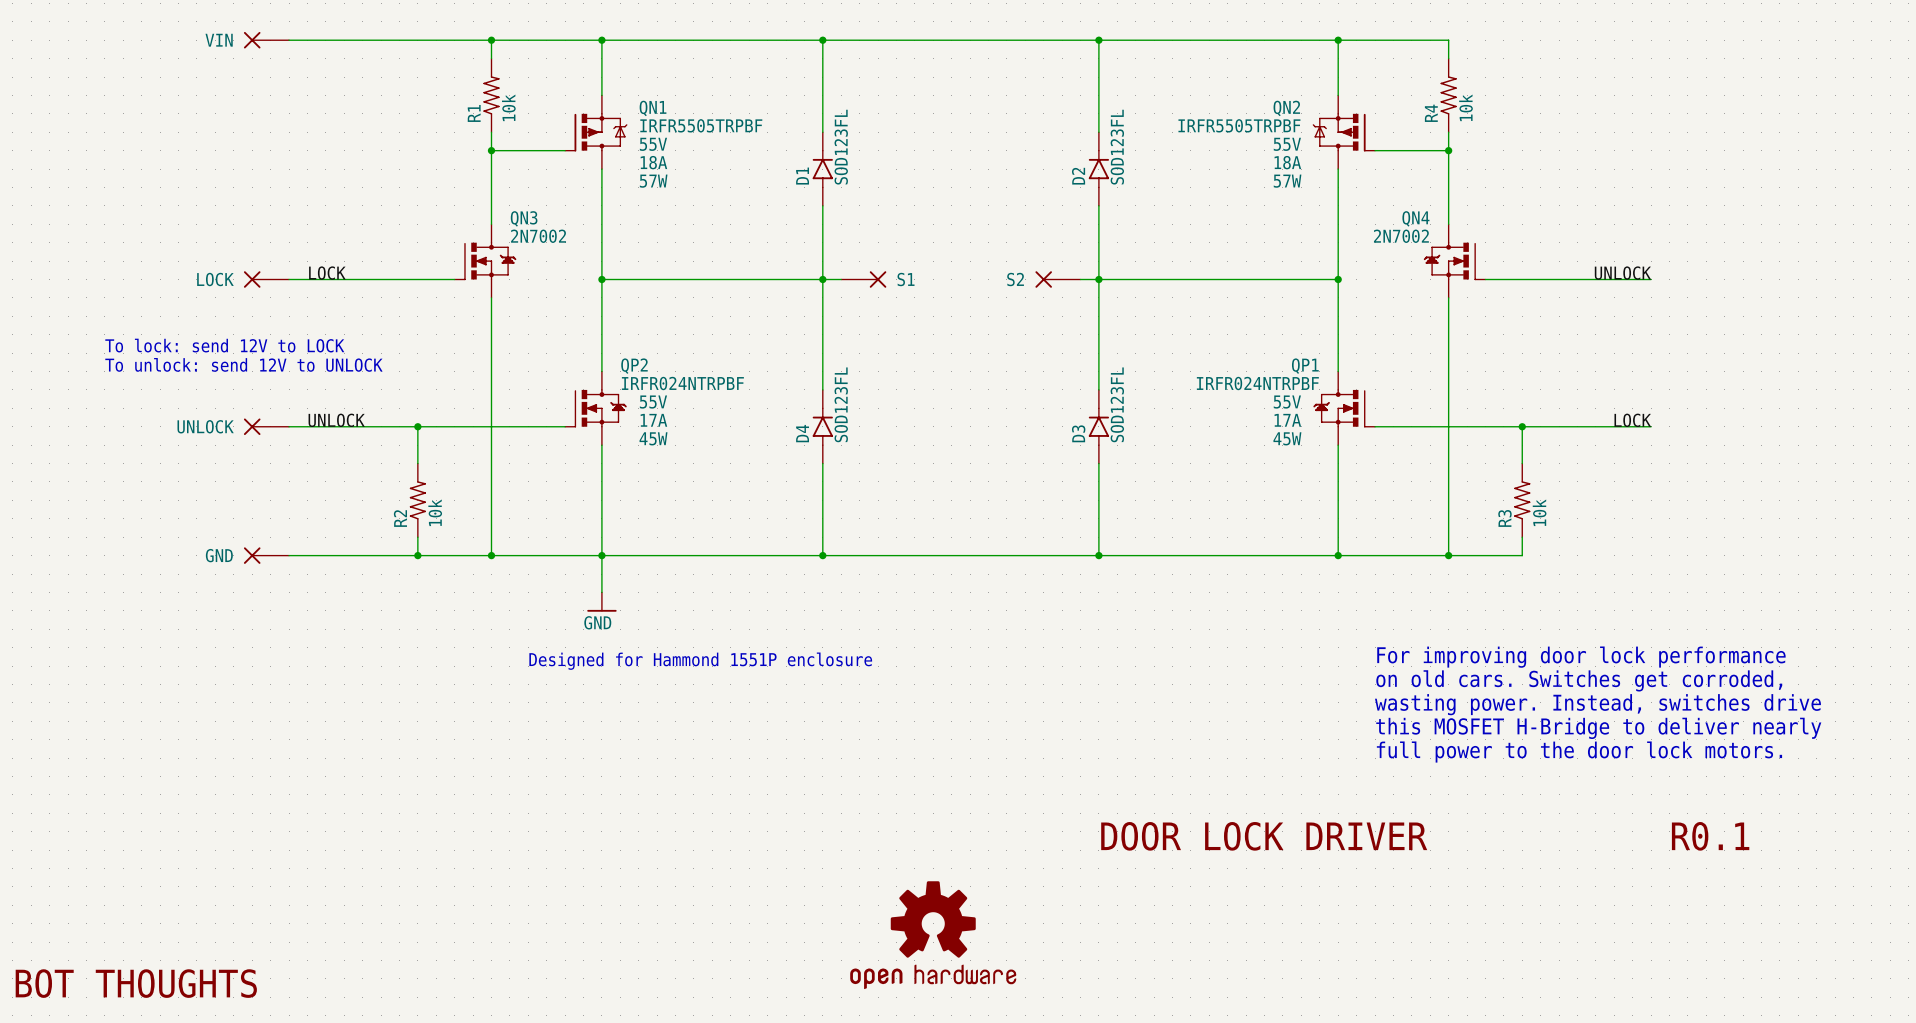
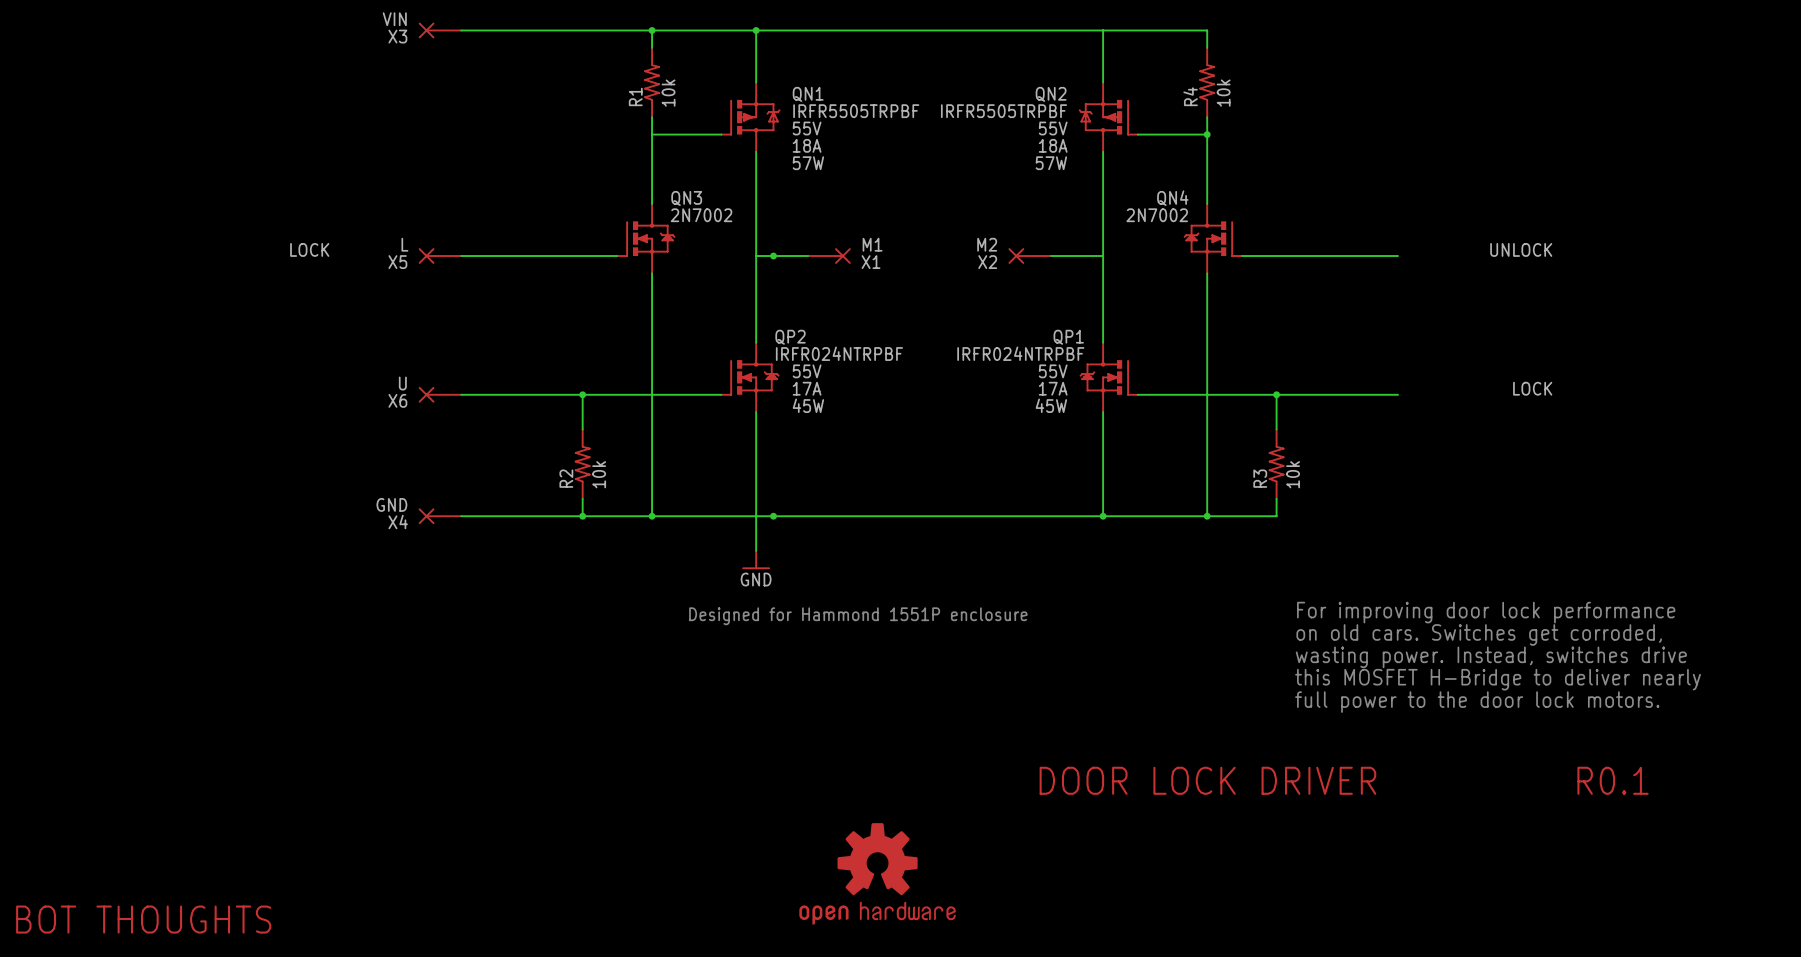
part: VIN (266, 40) -> none
wire: (289, 40) (491, 40) (491, 58) -> none
X3: none -> VIN (439, 30)
junction: (491, 40) -> none
wire: (601, 40) (601, 95) -> none
junction: (601, 40) -> none
wire: none -> (652, 30) (652, 47)
junction: none -> (652, 30)
wire: none -> (756, 30) (756, 82)
wire: (822, 40) (822, 132) -> (652, 117) (652, 203)
junction position: (822, 40) -> (756, 30)
wire: (1098, 40) (1098, 132) -> none
junction: (1098, 40) -> none
wire: (1282, 40) (1448, 40) (1448, 58) -> (1207, 30) (1207, 47)
wire: (1338, 40) (1338, 95) -> (1103, 30) (1103, 82)
junction: (1338, 40) -> none
R1 position: (491, 95) -> (652, 82)
R4 position: (1448, 95) -> (1207, 82)
wire: (491, 132) (491, 224) -> none
QN1 position: (595, 132) -> (750, 117)
QN2 position: (1344, 132) -> (1108, 117)
wire: (1448, 132) (1448, 224) -> (1207, 117) (1207, 203)
wire: (491, 150) (565, 150) -> none
junction: (491, 150) -> none
wire: none -> (652, 134) (721, 134)
junction: none -> (1207, 134)
wire: (1375, 150) (1448, 150) -> (1137, 134) (1207, 134)
junction: (1448, 150) -> none
wire: (601, 169) (601, 371) -> none
wire: none -> (756, 151) (756, 342)
D1: SOD123FL (822, 169) -> none
D2: SOD123FL (1098, 169) -> none
wire: (1338, 169) (1338, 371) -> (1103, 151) (1103, 342)
wire: (822, 205) (822, 389) -> none
wire: (1098, 205) (1098, 389) -> none
QN3 position: (485, 261) -> (646, 238)
QN4 position: (1454, 261) -> (1213, 238)
part: LOCK (266, 279) -> none
wire: (289, 279) (454, 279) -> none
X5: none -> L (439, 256)
wire: none -> (461, 256) (565, 256)
junction: (601, 279) -> none
wire: (657, 279) (804, 279) -> none
part: S1 (863, 279) -> none
X1: none -> M1 (829, 256)
part: S2 (1057, 279) -> none
X2: none -> M2 (1029, 256)
junction: (1098, 279) -> none
wire: (1172, 279) (1319, 279) -> none
junction: (1338, 279) -> none
wire: (1485, 279) (1651, 279) -> (1398, 256) (1259, 256)
wire: (491, 297) (491, 555) (289, 555) -> none
wire: none -> (652, 273) (652, 516)
wire: (1448, 297) (1448, 555) -> (1207, 273) (1207, 516)
text: To lock: send 12V to LOCK (224, 345) -> none
text: To unlock: send 12V to UNLOCK (243, 364) -> none
QP2 position: (595, 408) -> (750, 377)
QP1 position: (1344, 408) -> (1109, 377)
label: UNLOCK (336, 420) -> none
part: UNLOCK (266, 426) -> none
wire: (289, 426) (491, 426) -> none
wire: (417, 426) (417, 463) -> none
junction: (417, 426) -> none
X6: none -> U (439, 394)
wire: none -> (530, 394) (721, 394)
wire: none -> (582, 394) (582, 429)
junction: none -> (582, 394)
D4: SOD123FL (822, 426) -> none
D3: SOD123FL (1098, 426) -> none
wire: none -> (1137, 394) (1293, 394)
junction: none -> (1276, 394)
wire: (1485, 426) (1651, 426) -> none
wire: (1522, 426) (1522, 463) -> (1276, 394) (1276, 429)
junction: (1522, 426) -> none
wire: (601, 445) (601, 592) -> none
wire: none -> (756, 412) (756, 550)
wire: (1338, 445) (1338, 555) -> (1103, 412) (1103, 516)
wire: (822, 463) (822, 555) -> none
wire: (1098, 463) (1098, 555) -> none
R2 position: (417, 500) -> (582, 464)
R3 position: (1522, 500) -> (1276, 464)
wire: (417, 537) (417, 555) -> none
wire: none -> (582, 498) (582, 516)
wire: (1522, 537) (1522, 555) (1356, 555) -> (1276, 498) (1276, 516)
part: GND (266, 555) -> none
junction: (417, 555) -> none
X4: none -> GND (439, 516)
junction: (491, 555) -> none
junction position: (601, 555) -> (582, 516)
junction: none -> (652, 516)
junction: (1098, 555) -> none
junction: none -> (1103, 516)
junction: none -> (1207, 516)
junction: (1338, 555) -> none
junction: (1448, 555) -> none
power symbol: GND (601, 602) -> none
power symbol: none -> GND (756, 560)
text: Designed for Hammond 1551P enclosure (700, 661) -> none
text: none -> Designed for Hammond 1551P enclosure (858, 616)

